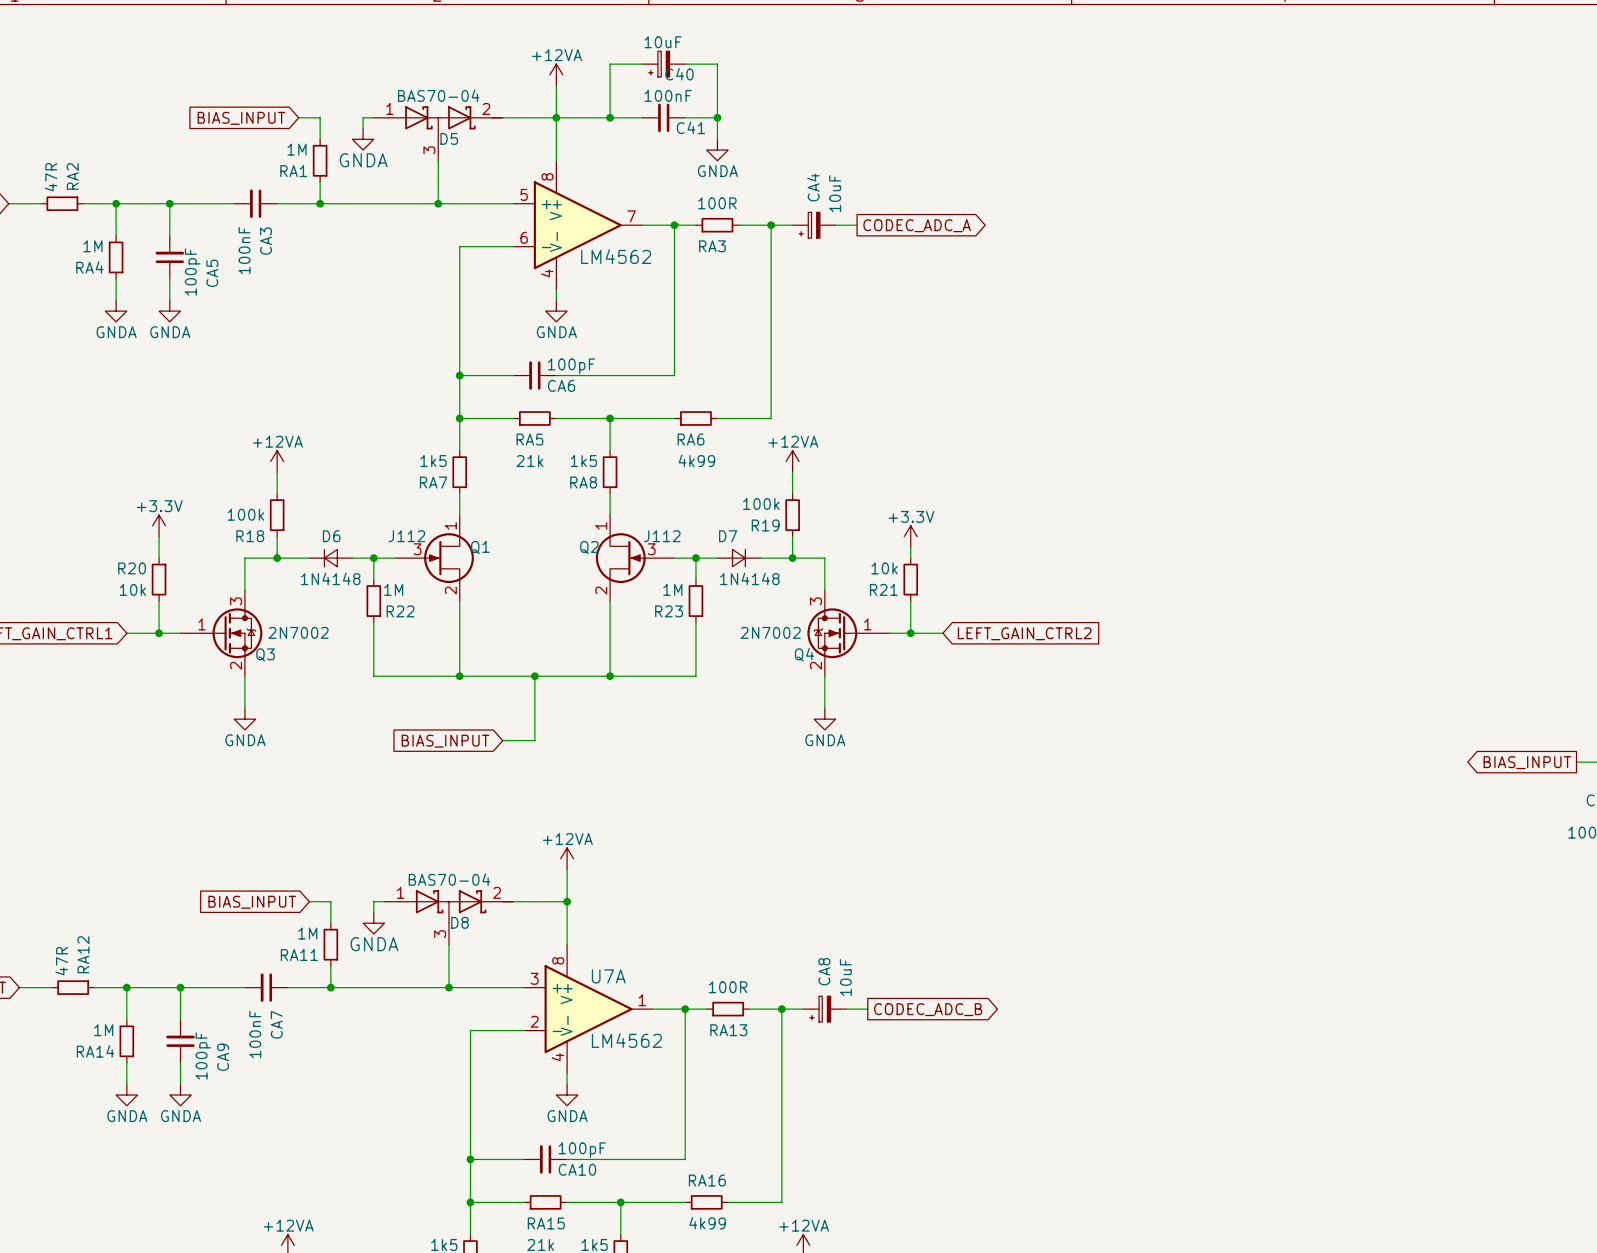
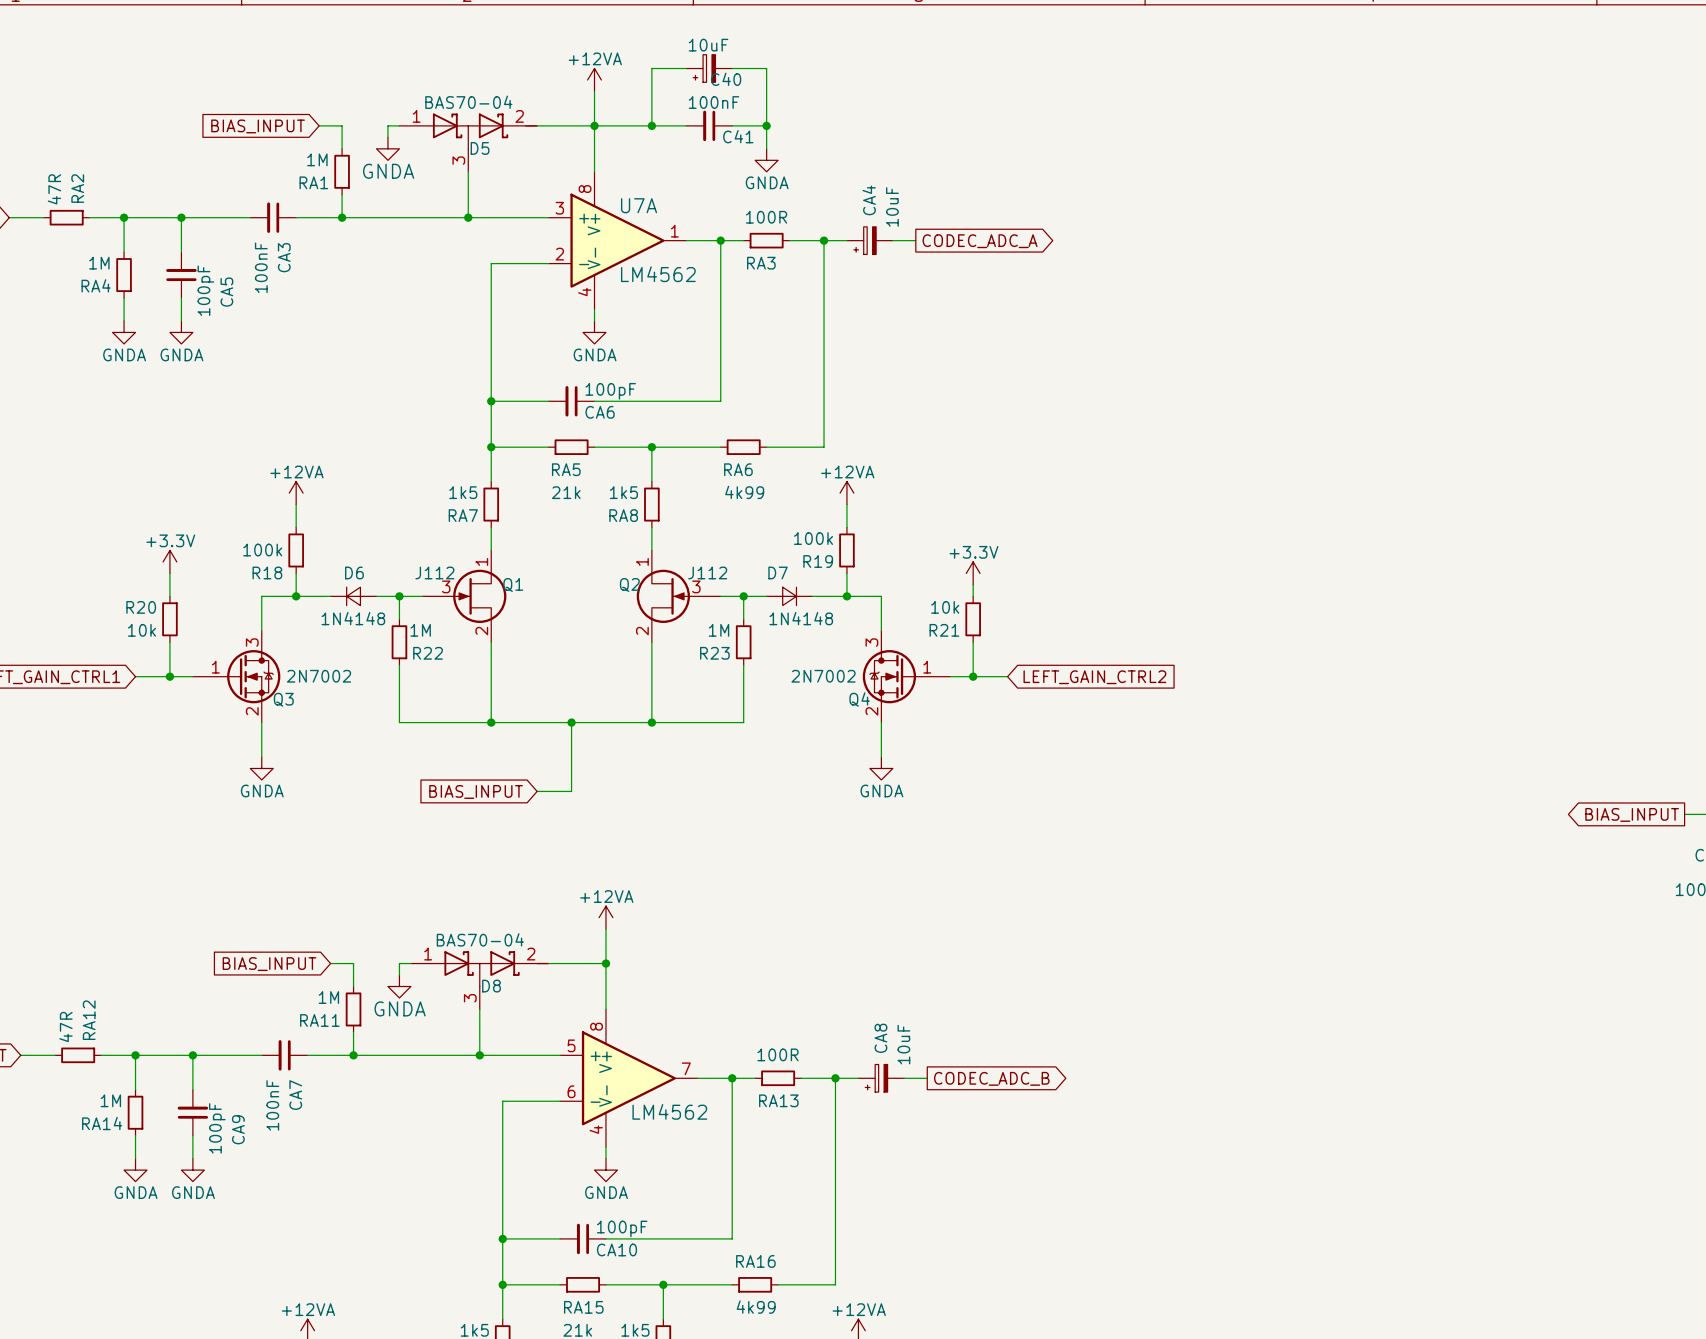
part: LM4562 (577, 225) -> none
U7A position: (588, 1009) -> (617, 240)
part: none -> LM4562 (628, 1078)

